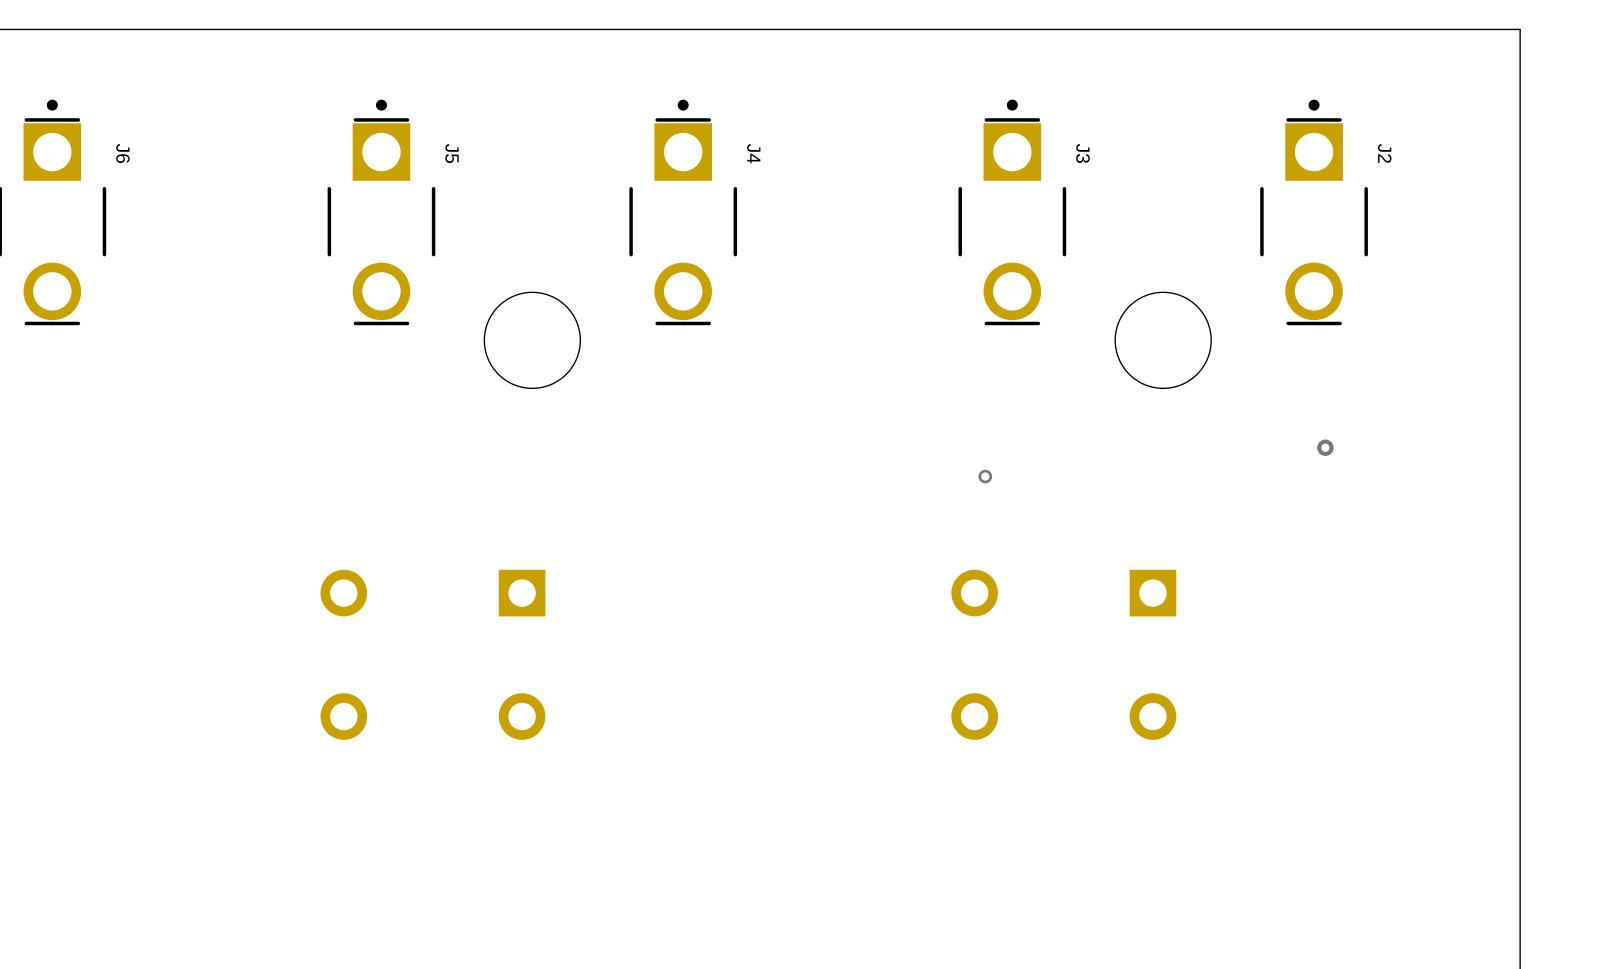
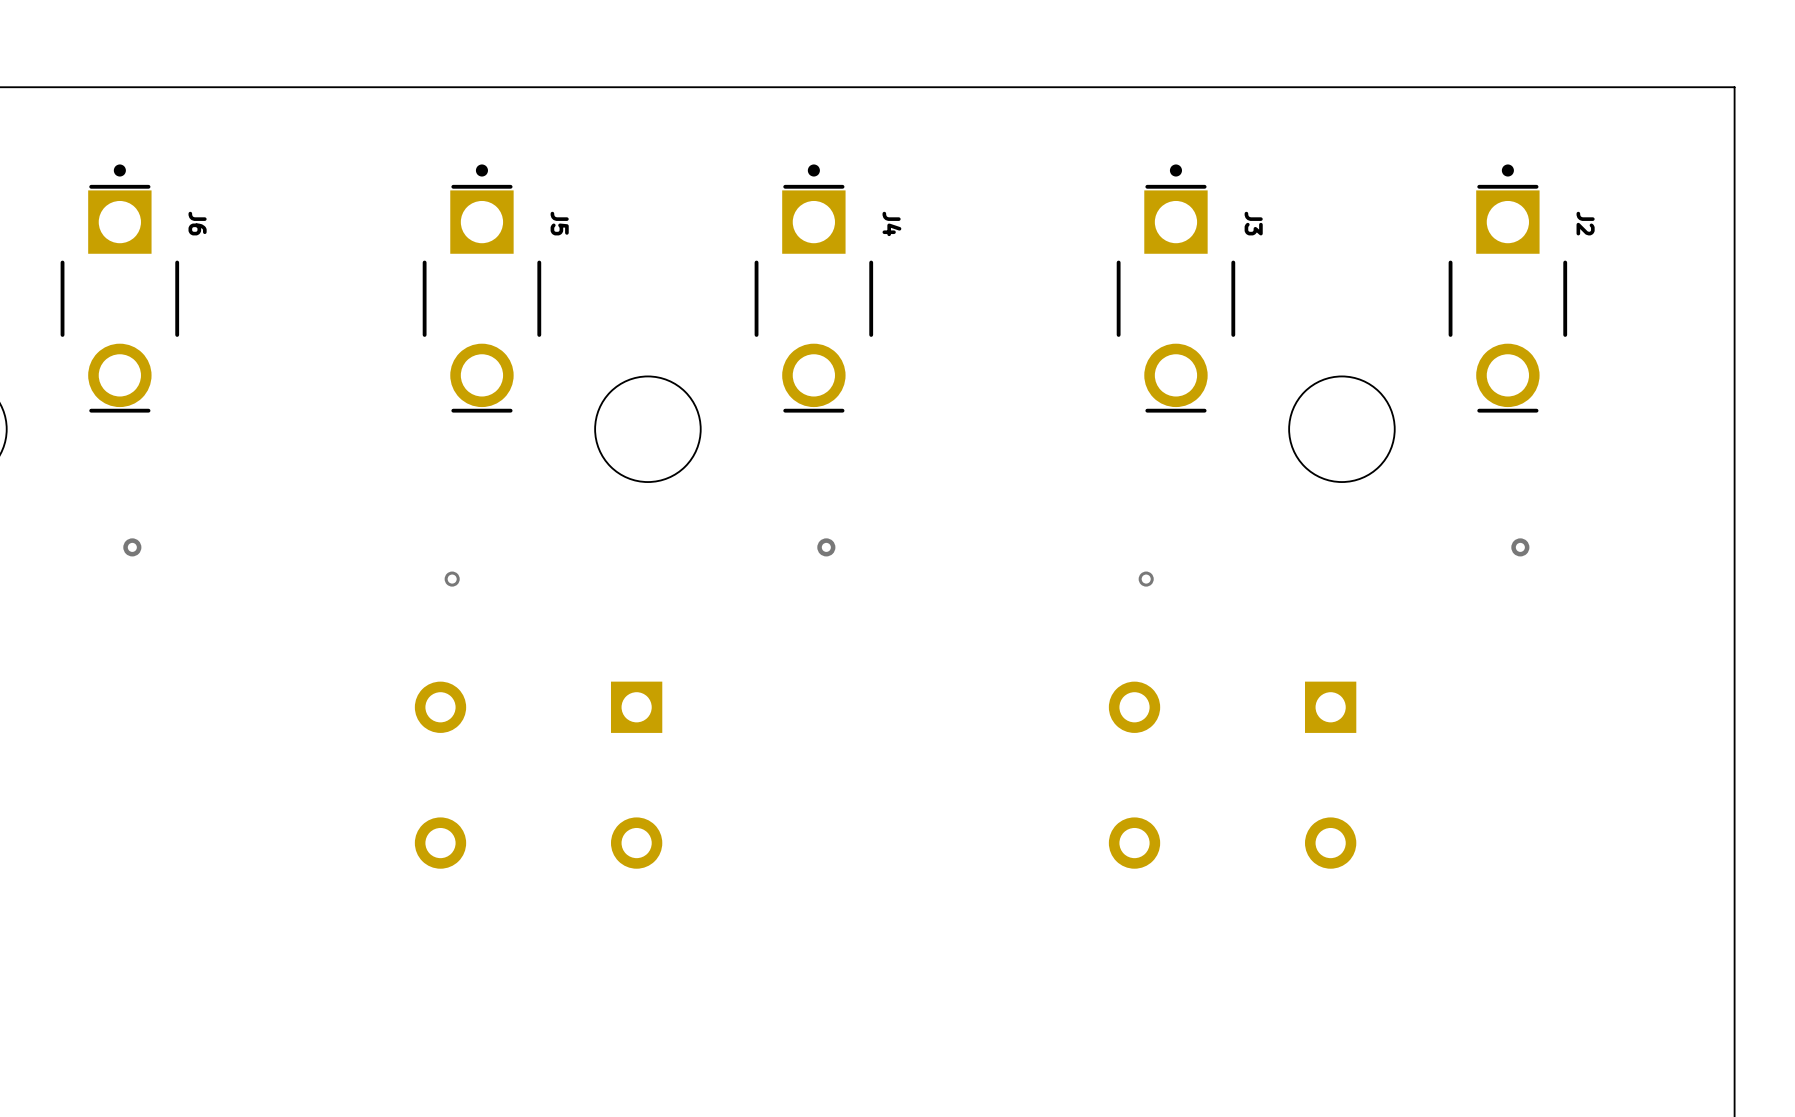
via: none -> (132, 547)
via: none -> (826, 547)
via: none -> (452, 579)

